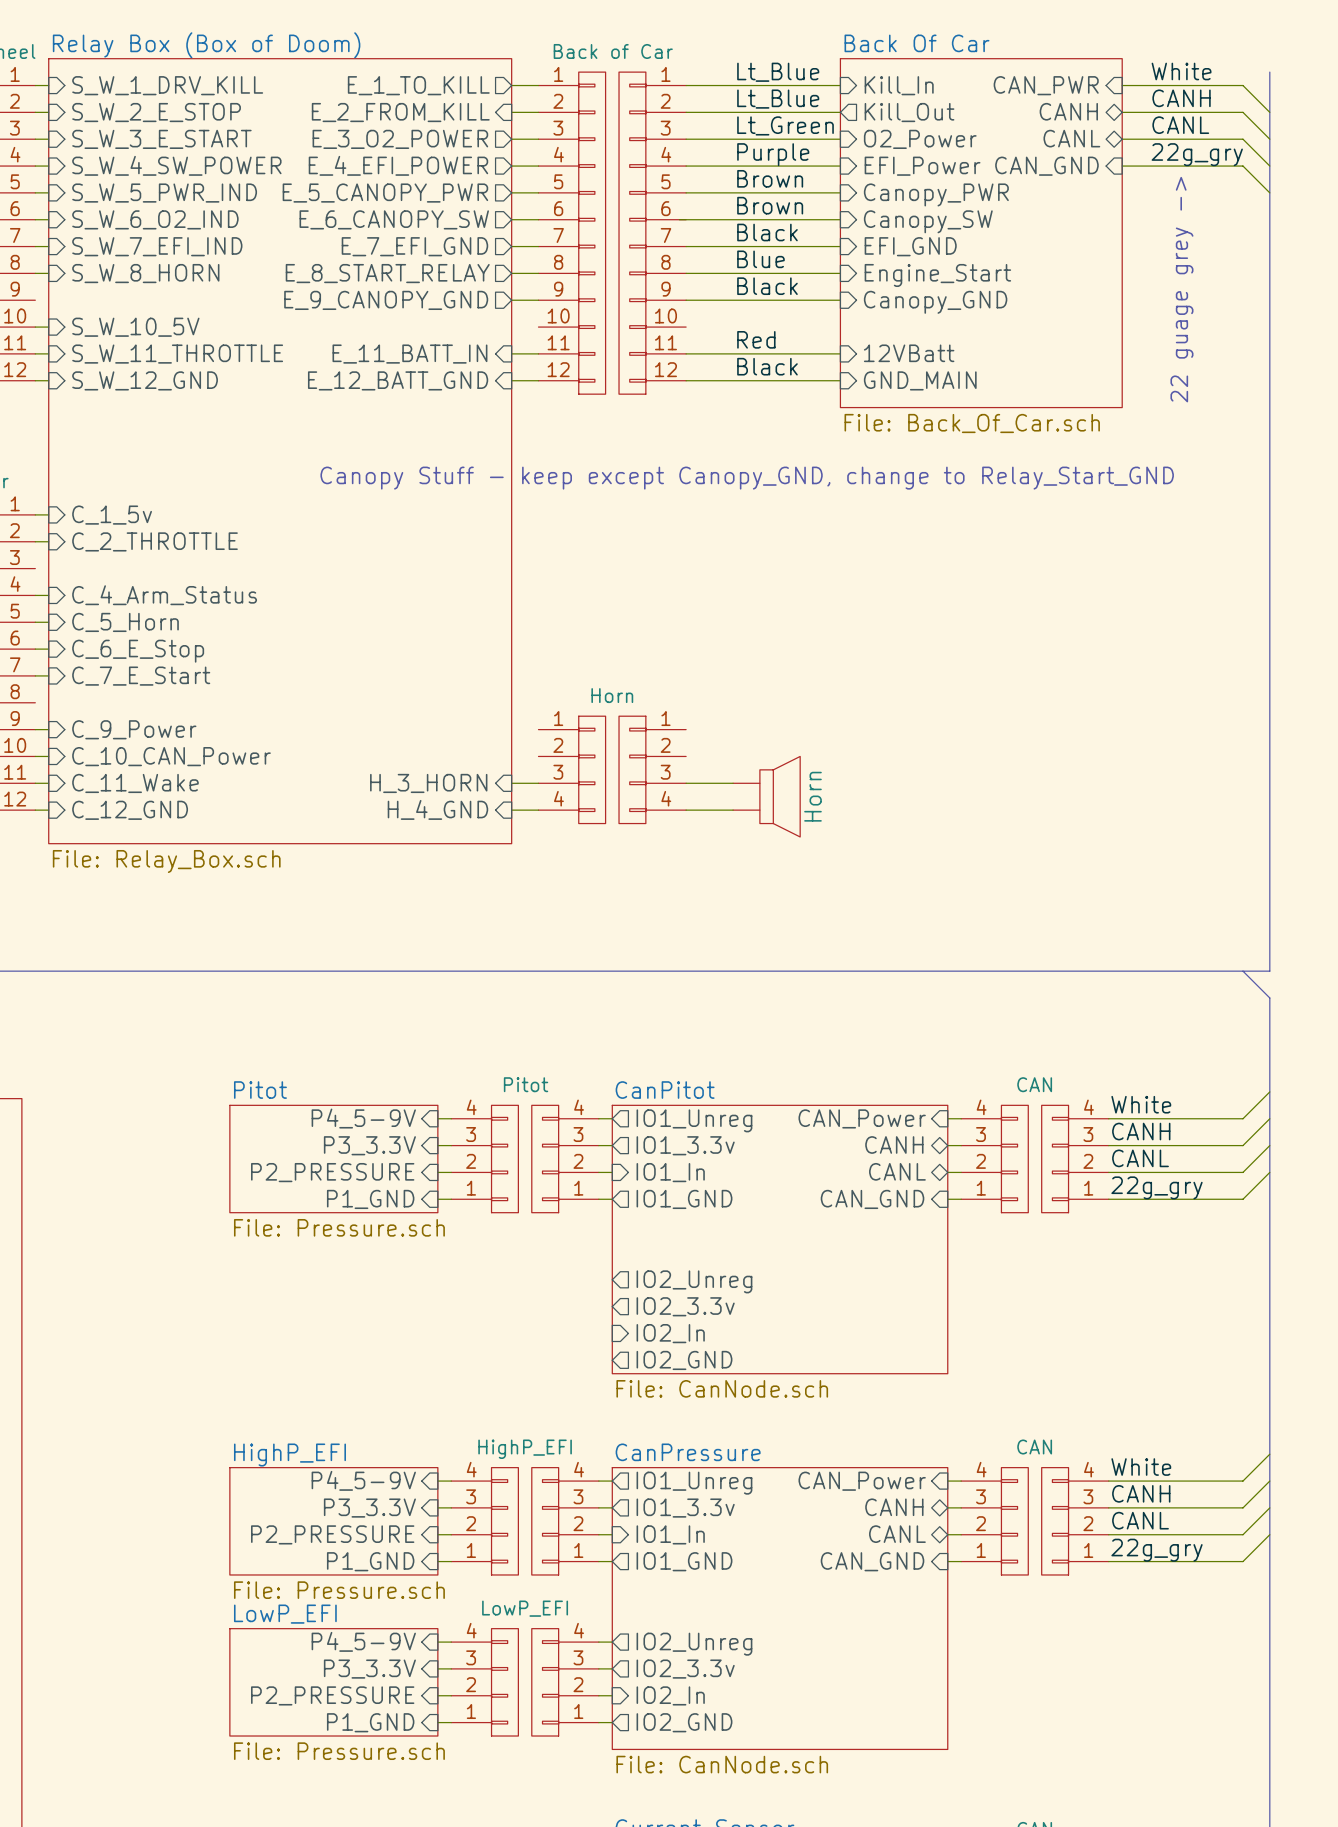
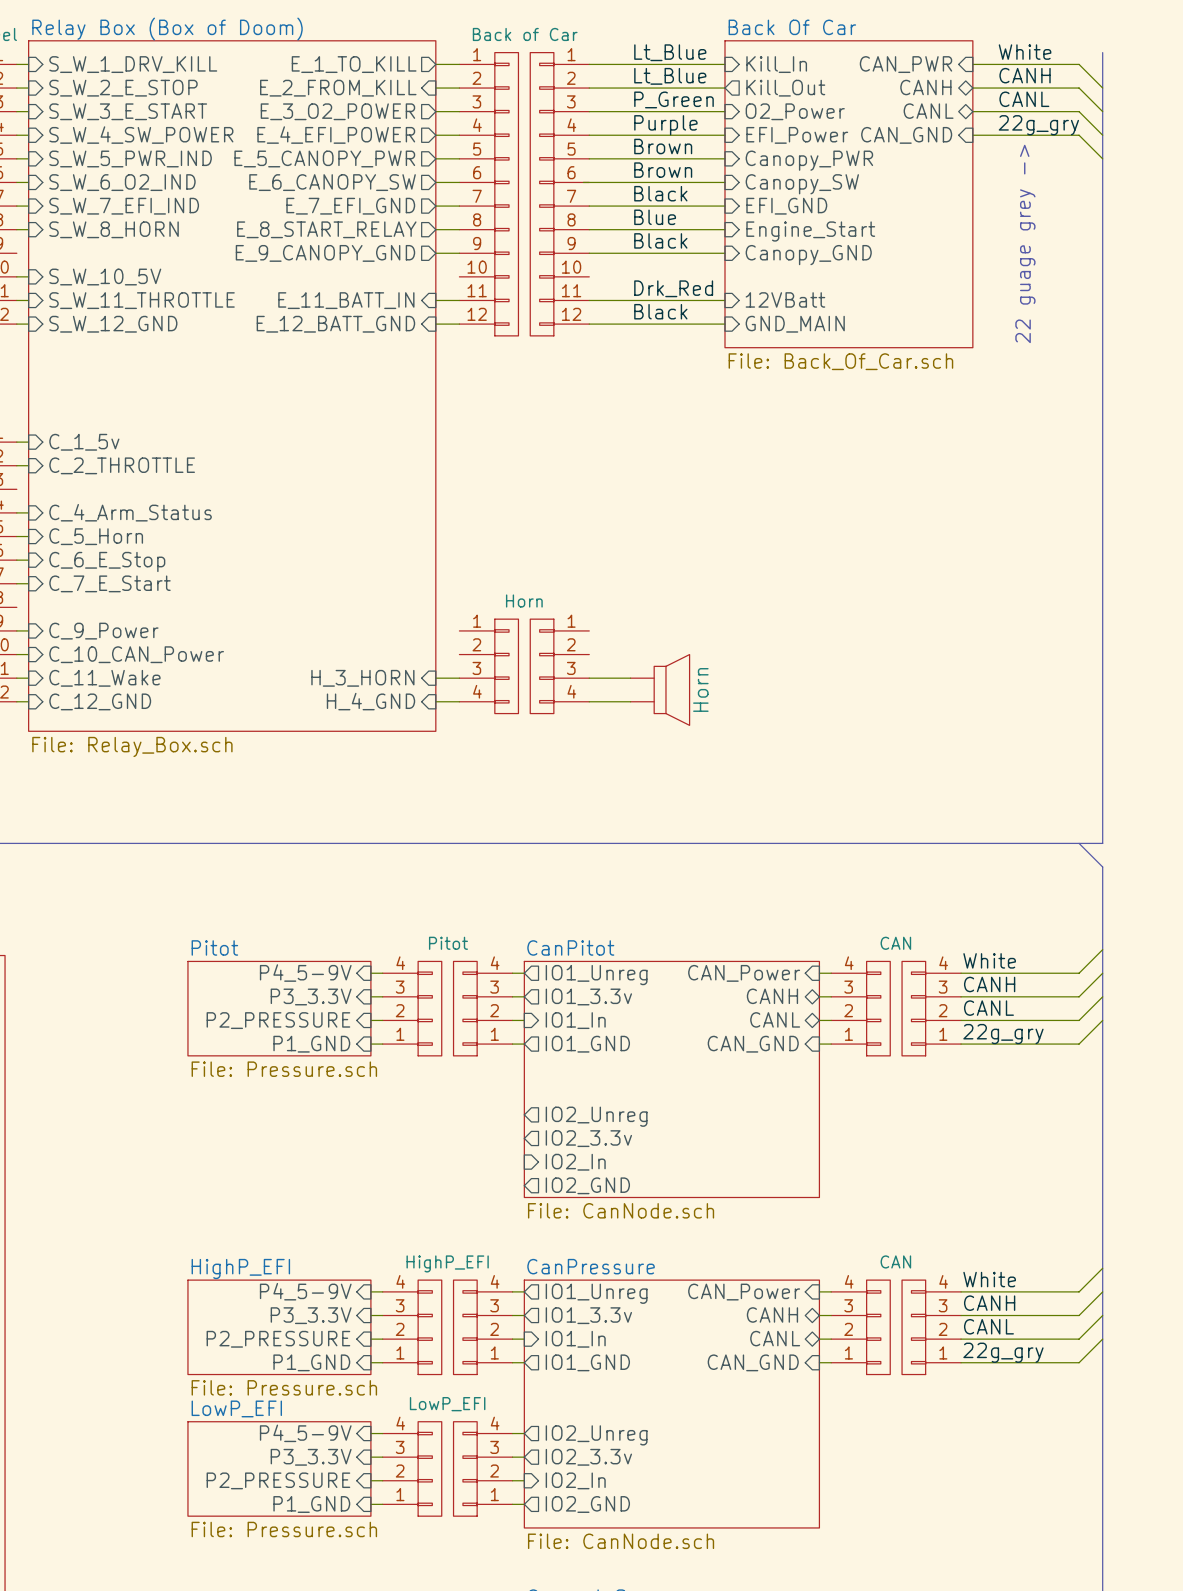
label: Lt_Green (785, 125) -> P_Green (673, 99)
label: Red (756, 339) -> Drk_Red (673, 288)
text: Canopy Stuff - keep except Canopy_GND, change to Relay_Start_GND (747, 478) -> none

